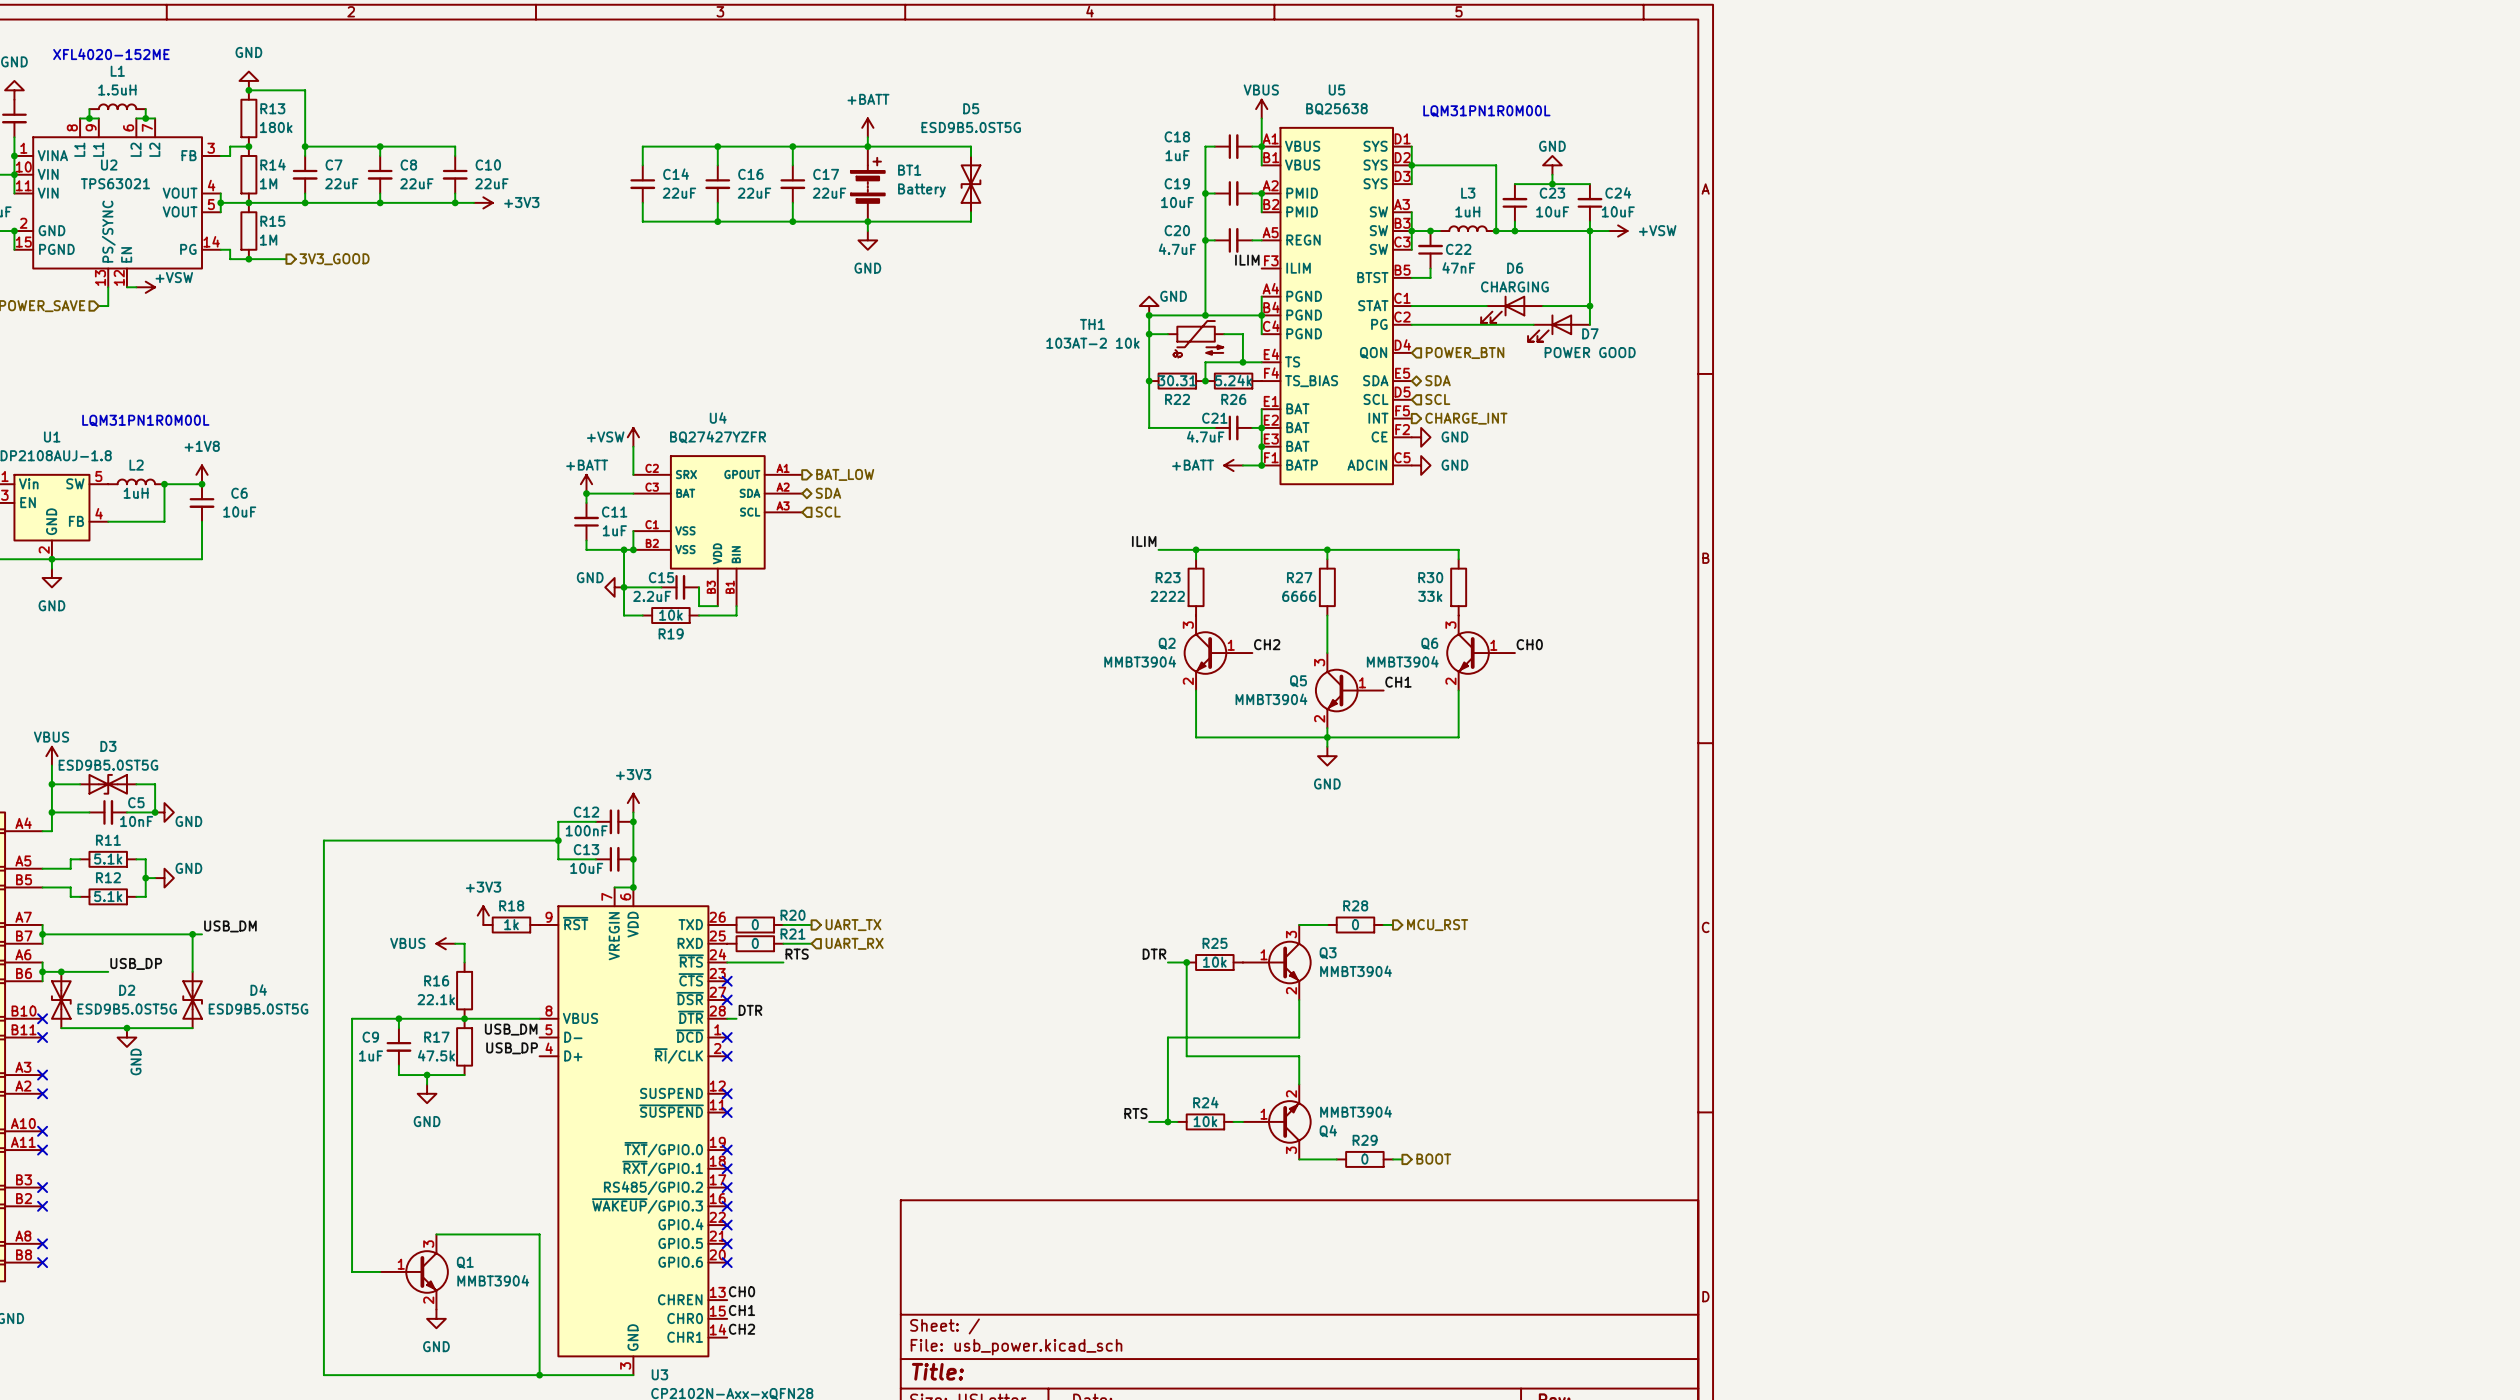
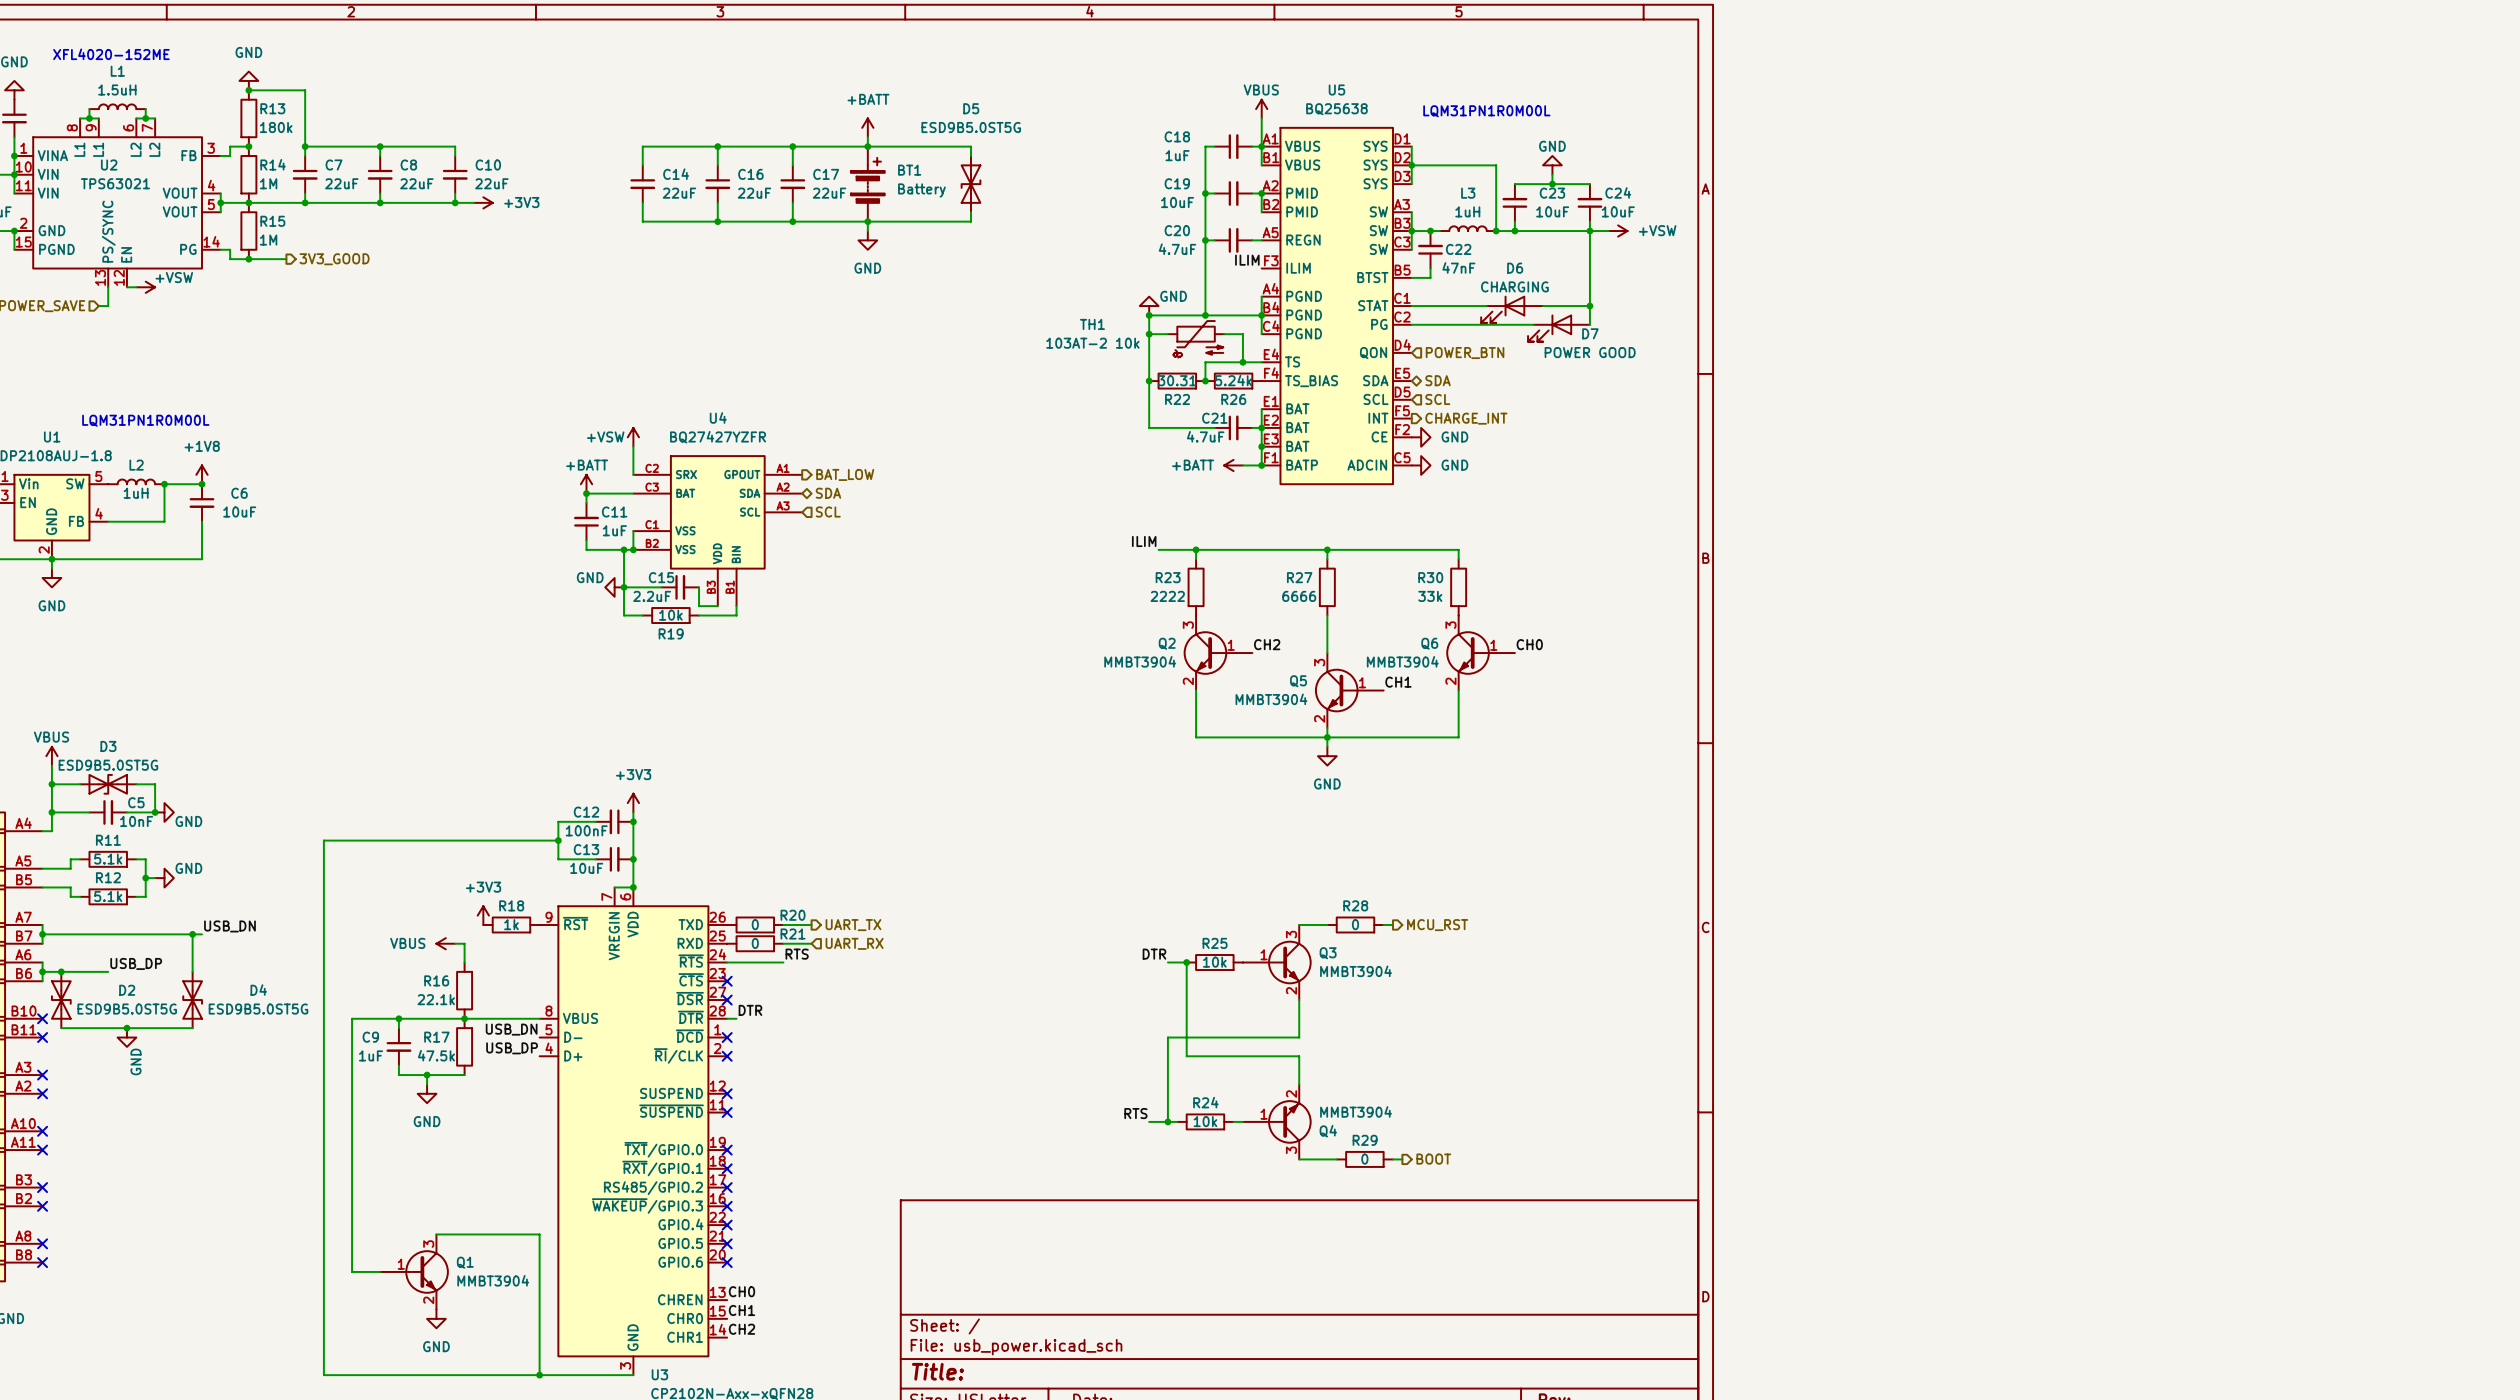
label: USB_DM (230, 926) -> USB_DN (229, 926)
label: USB_DM (511, 1029) -> USB_DN (511, 1029)

